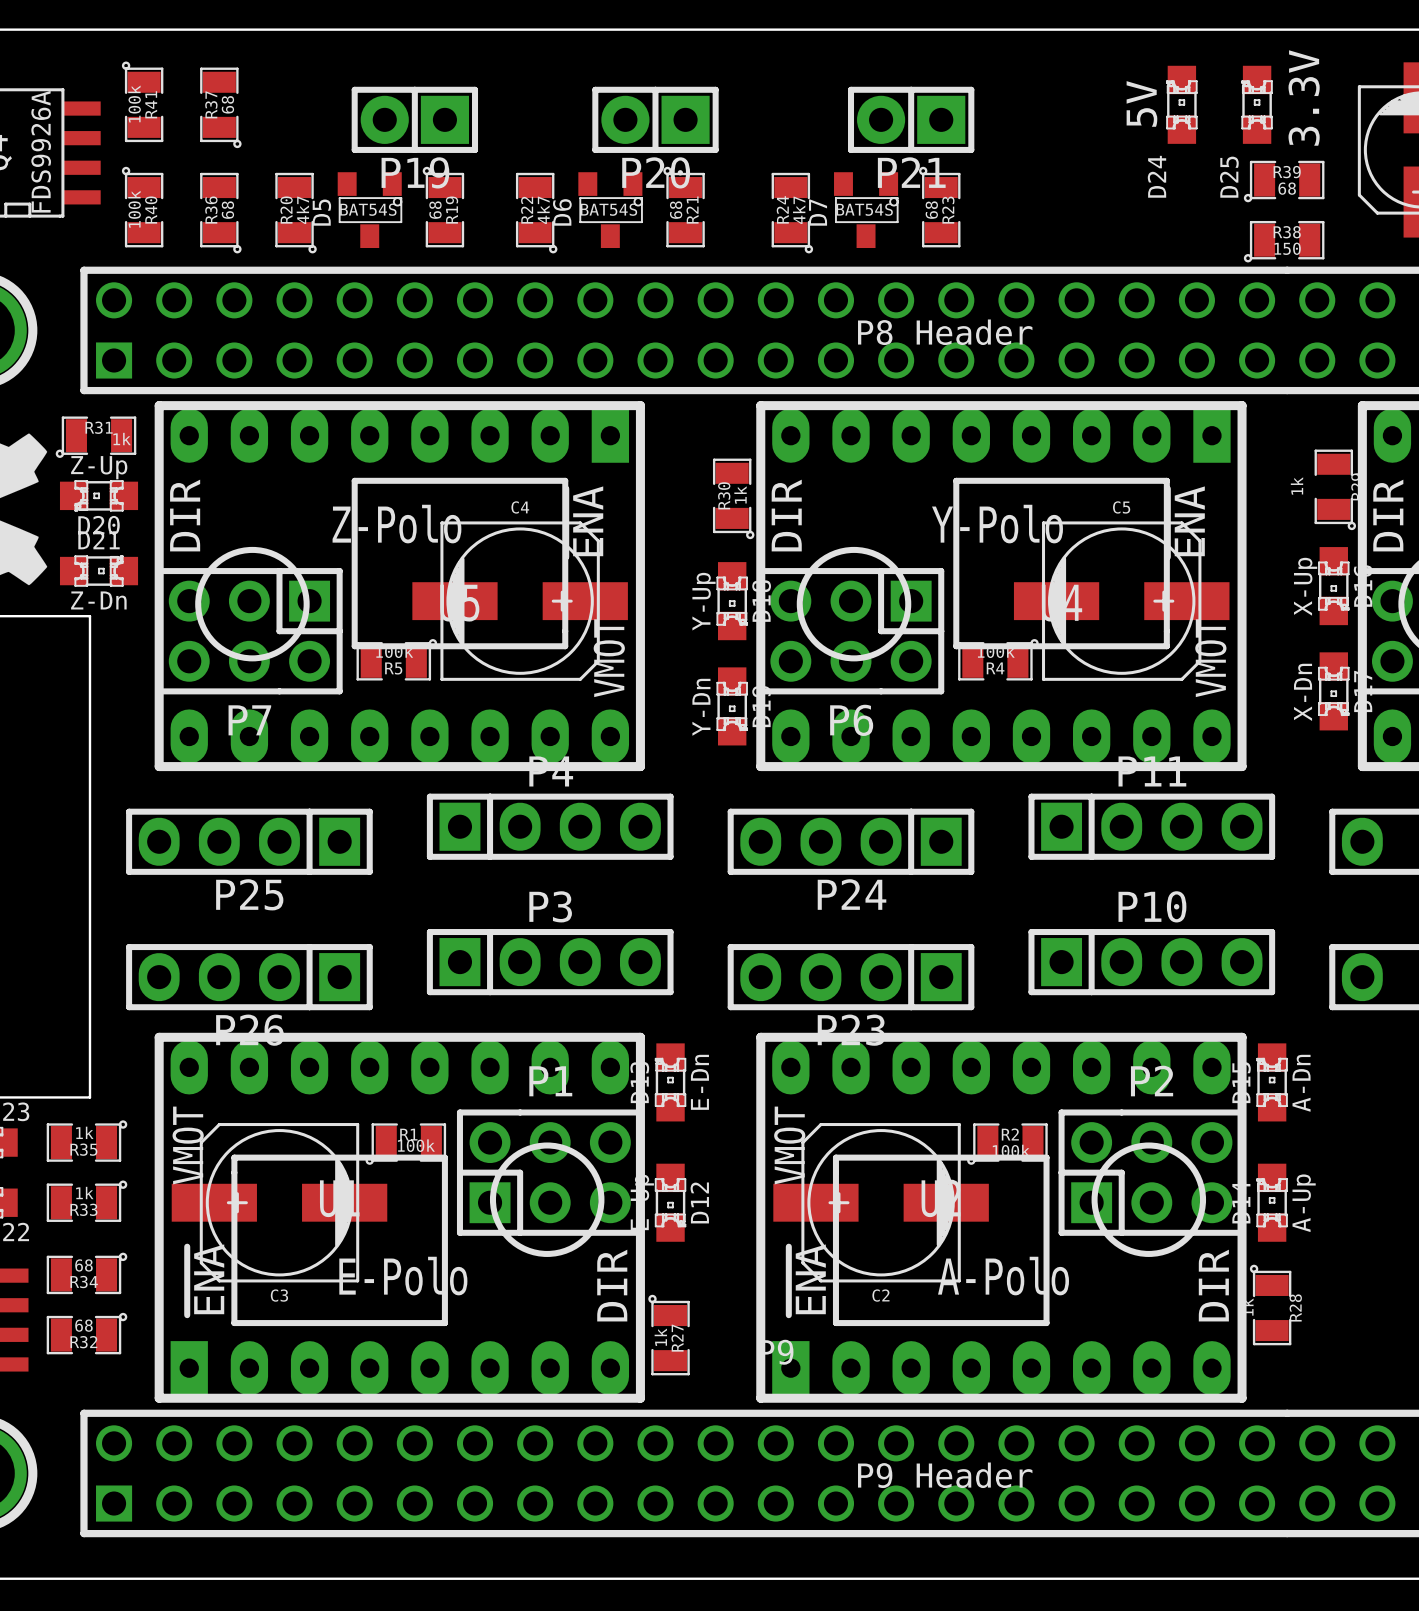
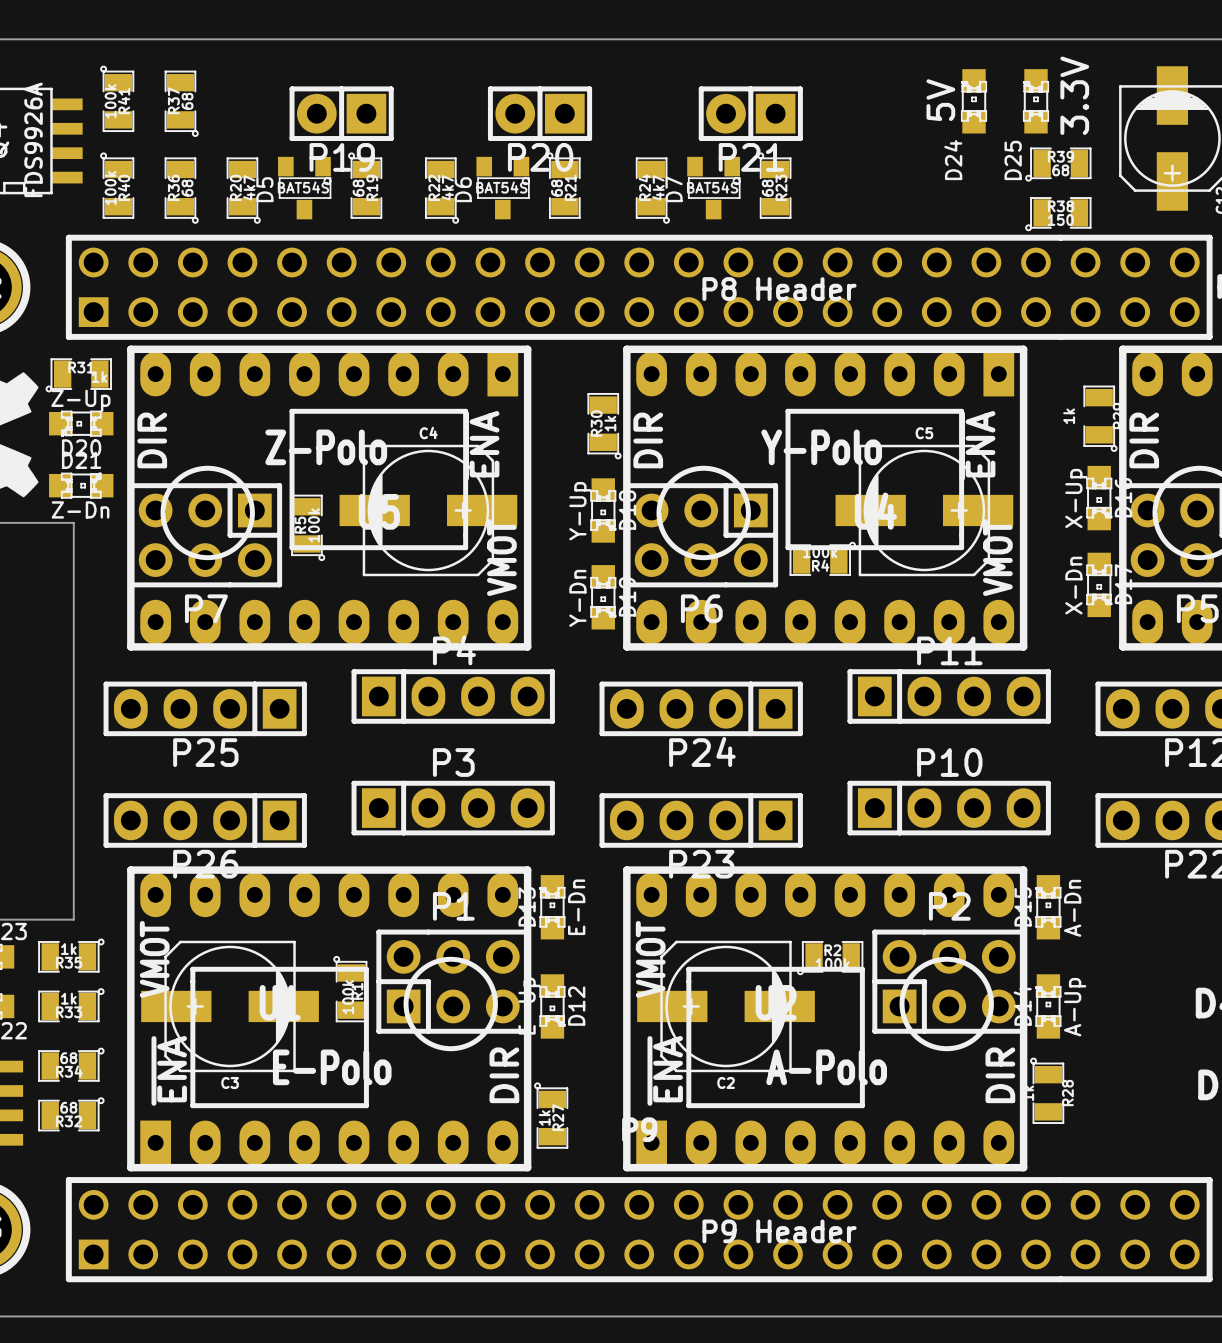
R5 rotation: 0° (396, 659) -> 90° clockwise (308, 527)
R1 rotation: 0° (405, 1144) -> 90° clockwise (350, 989)

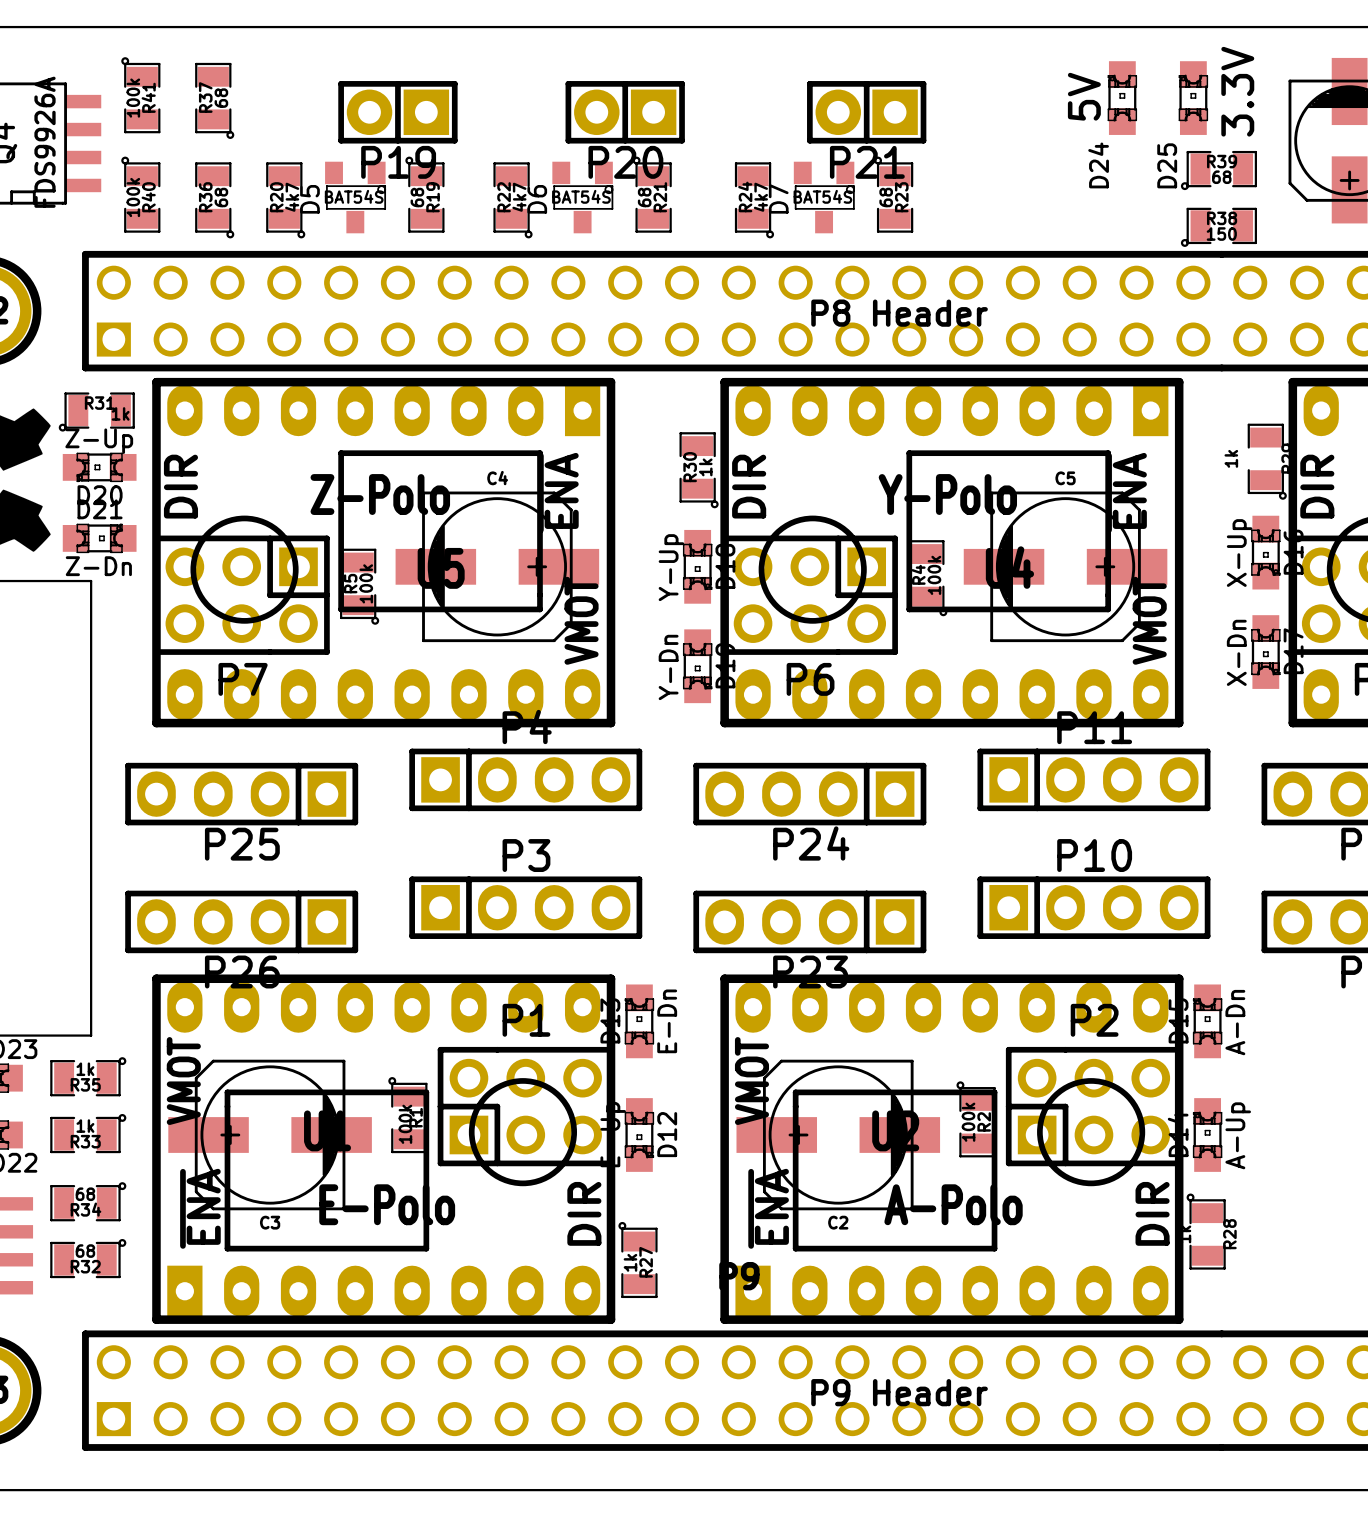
R4 rotation: 0° (822, 558) -> 90° clockwise (927, 578)
R4 position: (822, 558) -> (927, 578)
R2 rotation: 0° (830, 958) -> 90° clockwise (976, 1119)

